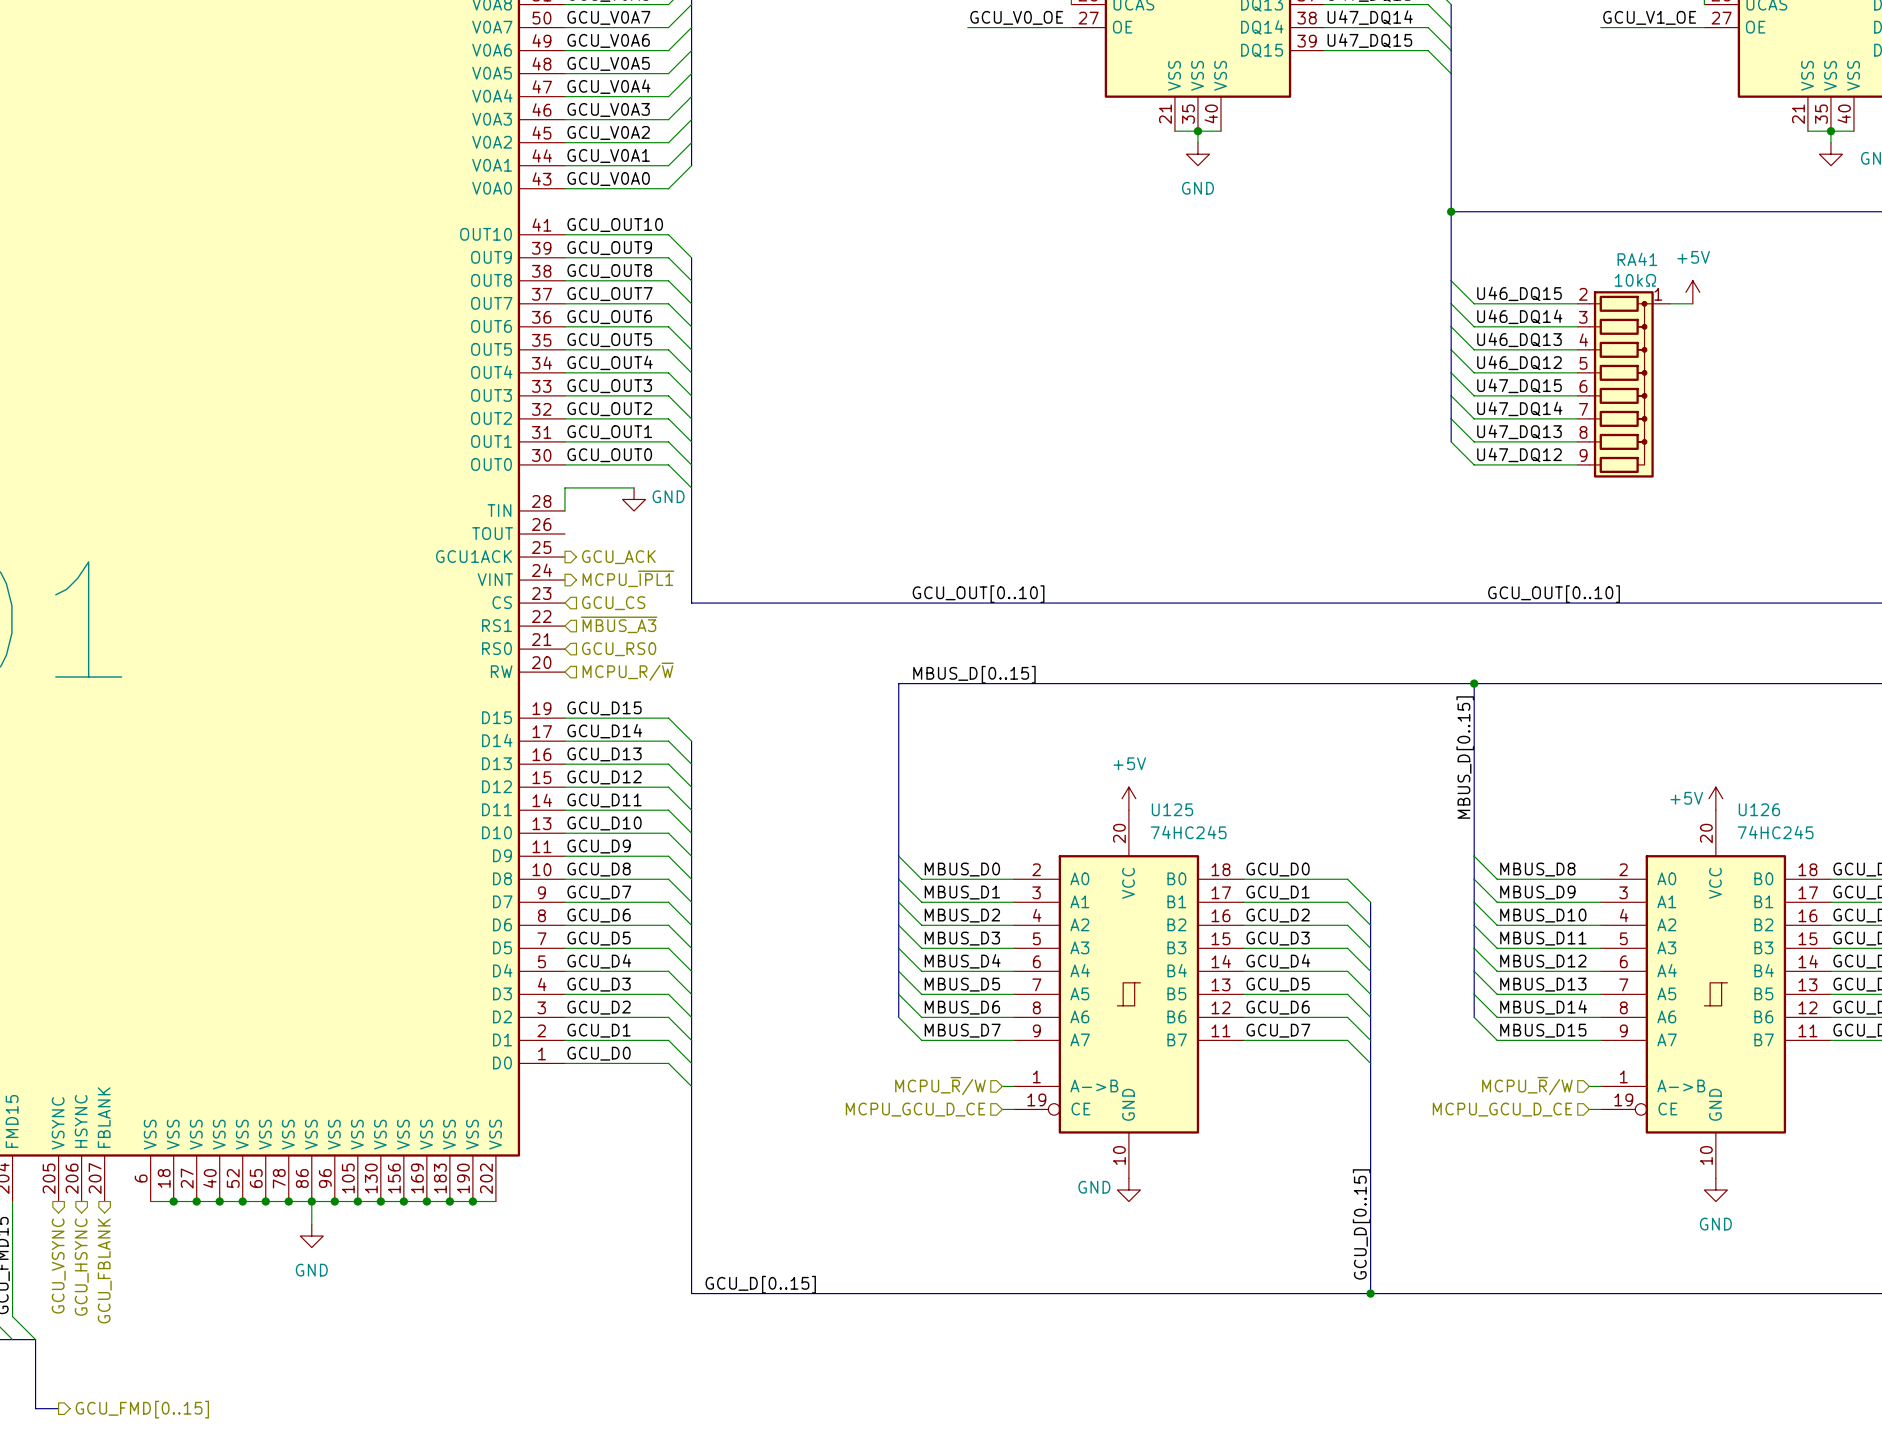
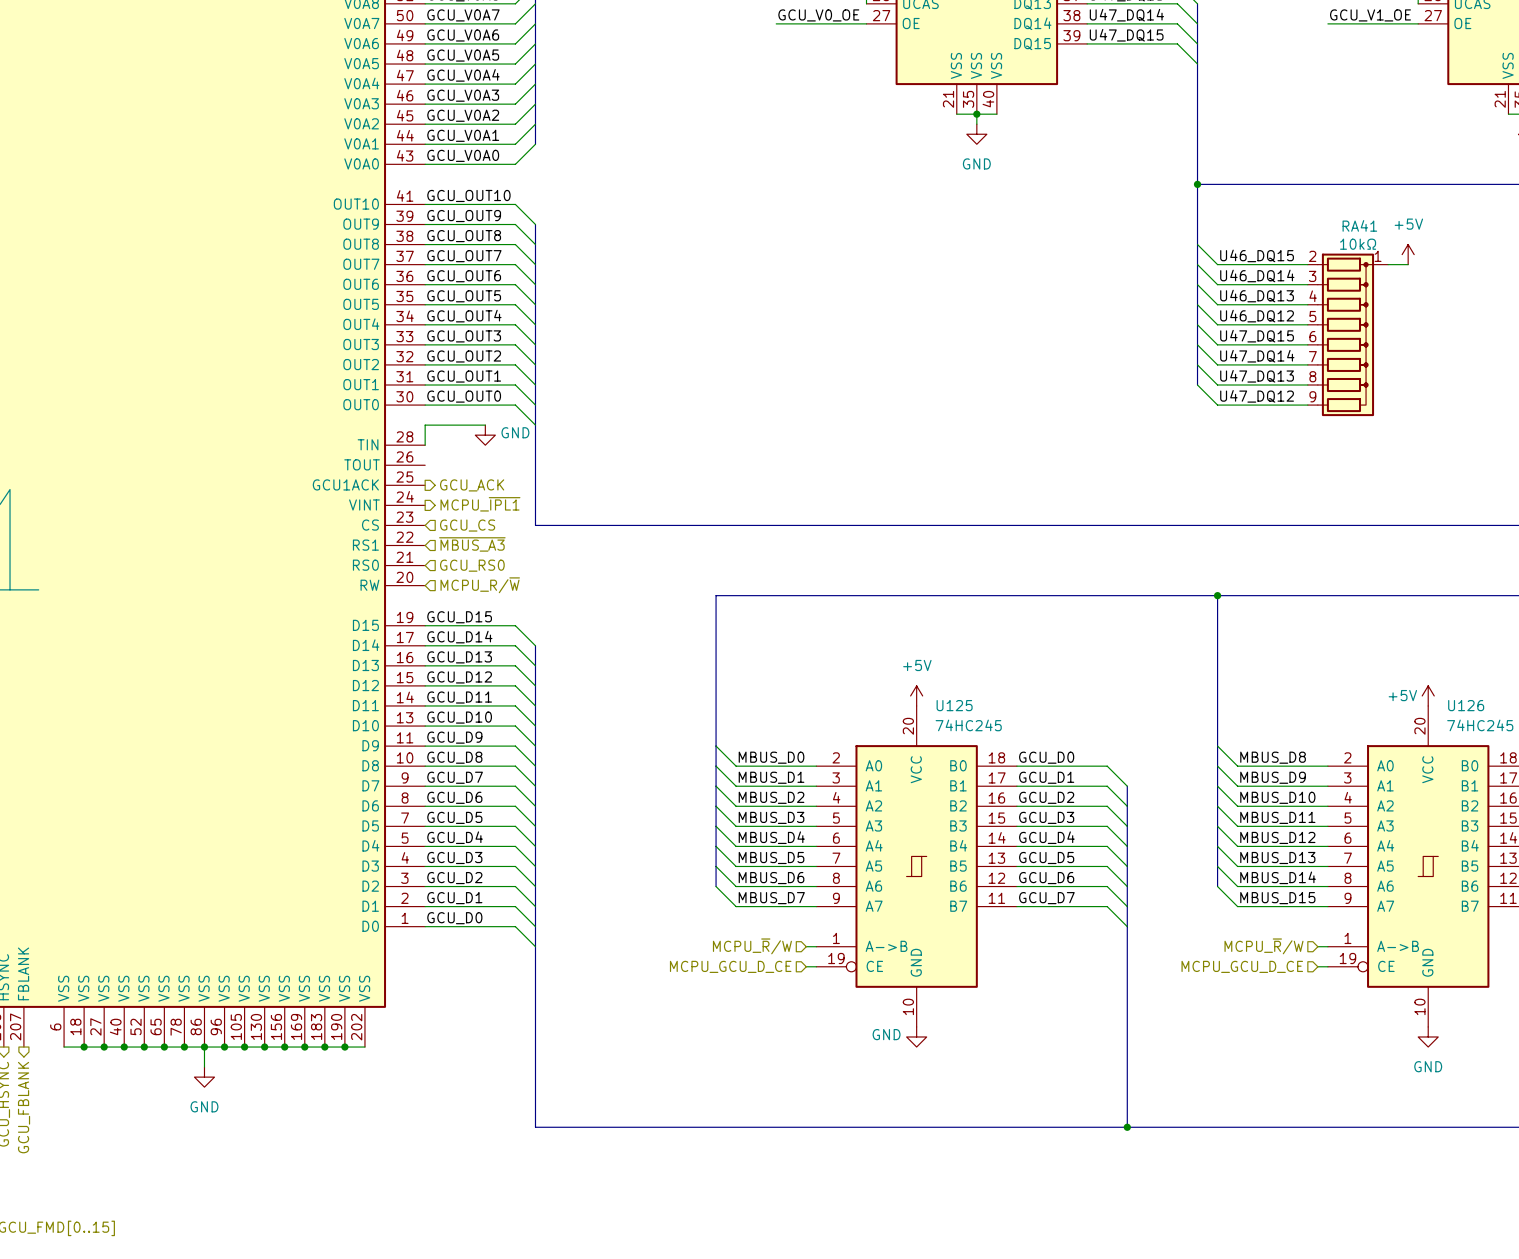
label: GCU_OUT[0..10] (978, 594) -> none
label: GCU_OUT[0..10] (1554, 594) -> none
label: MBUS_D[0..15] (974, 674) -> none
label: MBUS_D[0..15] (1465, 757) -> none
label: GCU_D[0..15] (1361, 1224) -> none
label: GCU_D[0..15] (760, 1284) -> none

